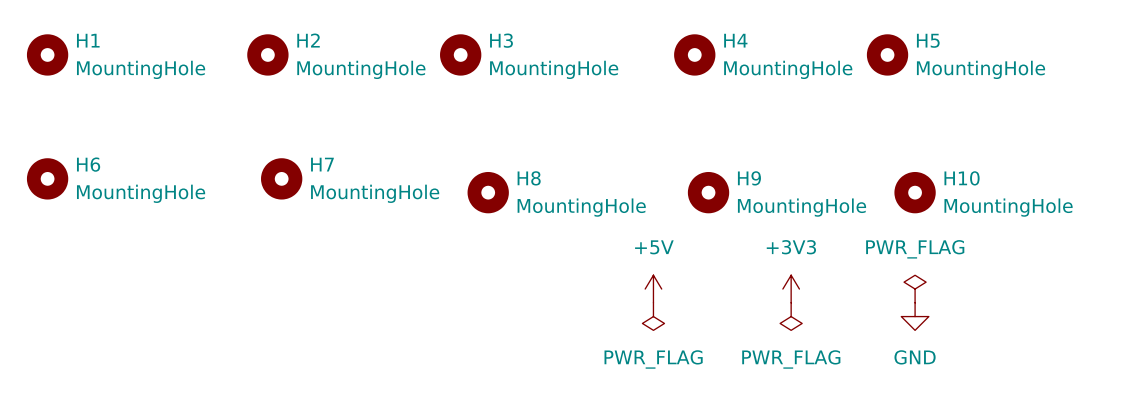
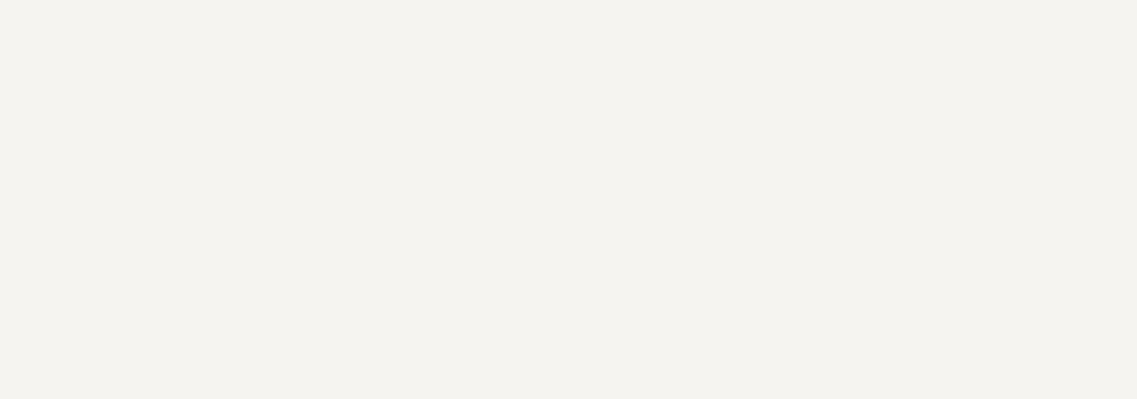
H1: MountingHole (47, 54) -> none
H2: MountingHole (267, 54) -> none
H3: MountingHole (460, 54) -> none
H4: MountingHole (694, 54) -> none
H5: MountingHole (887, 54) -> none
H6: MountingHole (47, 178) -> none
H7: MountingHole (281, 178) -> none
H8: MountingHole (488, 192) -> none
H9: MountingHole (708, 192) -> none
H10: MountingHole (915, 192) -> none
power symbol: +5V (653, 289) -> none
power symbol: +3V3 (791, 289) -> none
power symbol: PWR_FLAG (915, 289) -> none
power symbol: PWR_FLAG (653, 316) -> none
power symbol: PWR_FLAG (791, 316) -> none
power symbol: GND (915, 316) -> none

